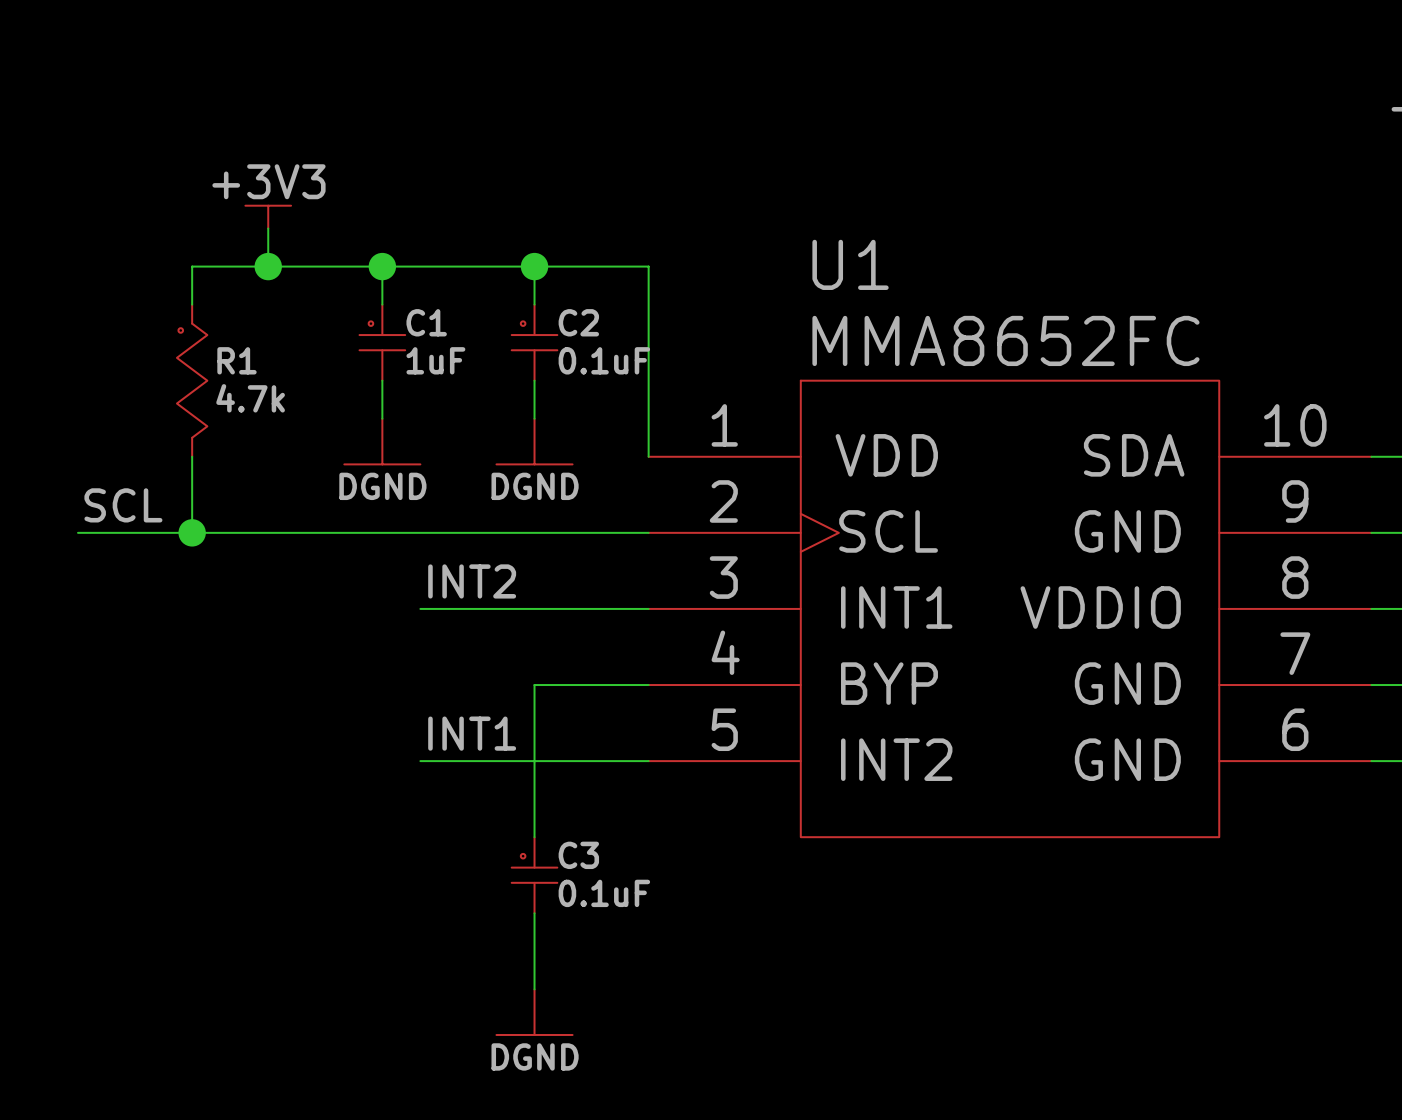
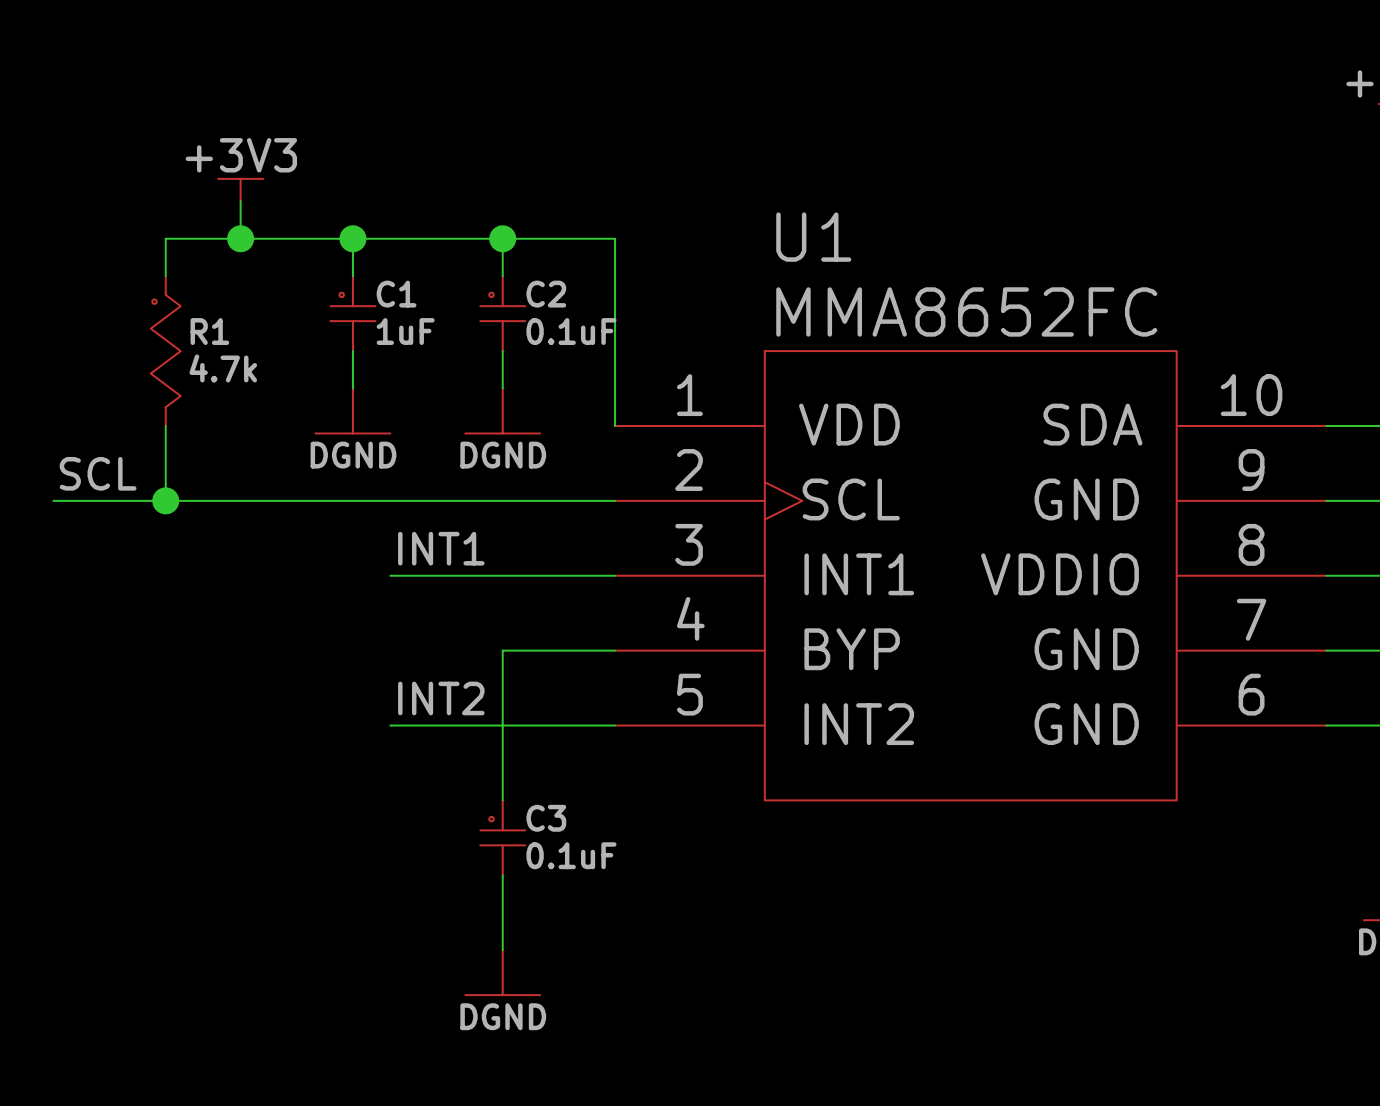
label: INT2 (472, 581) -> INT1 (441, 548)
label: INT1 (472, 733) -> INT2 (441, 698)

